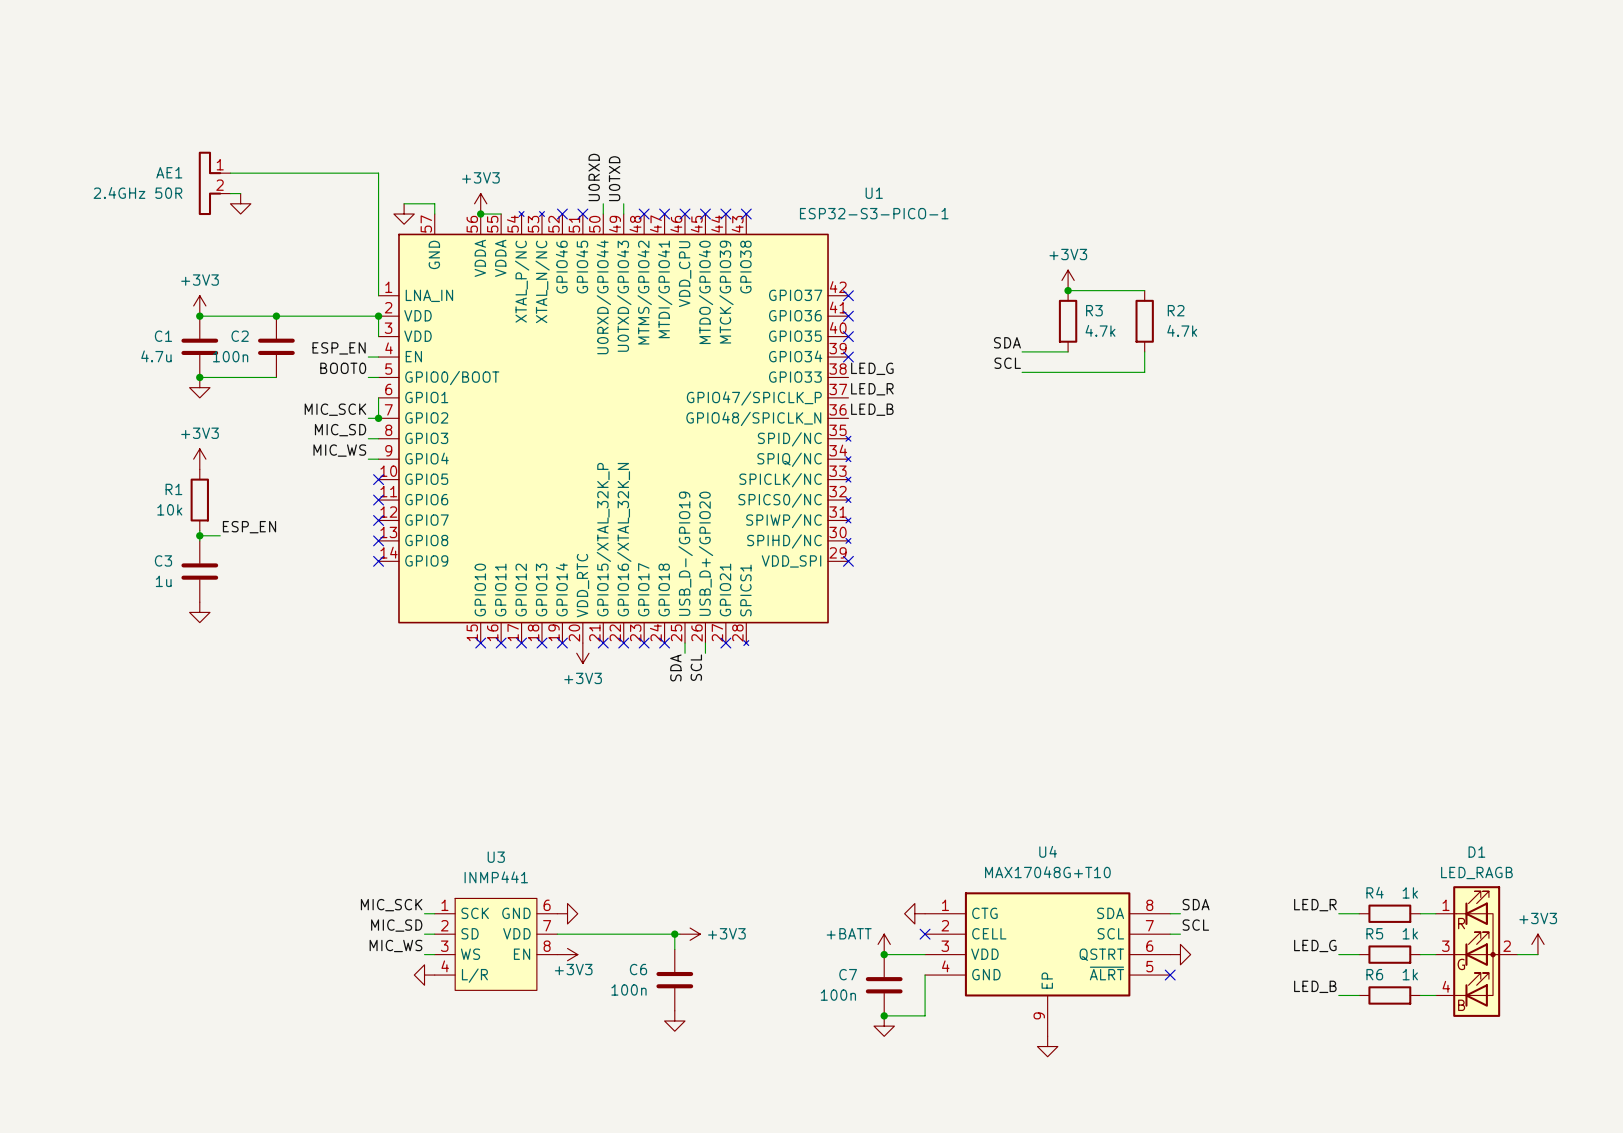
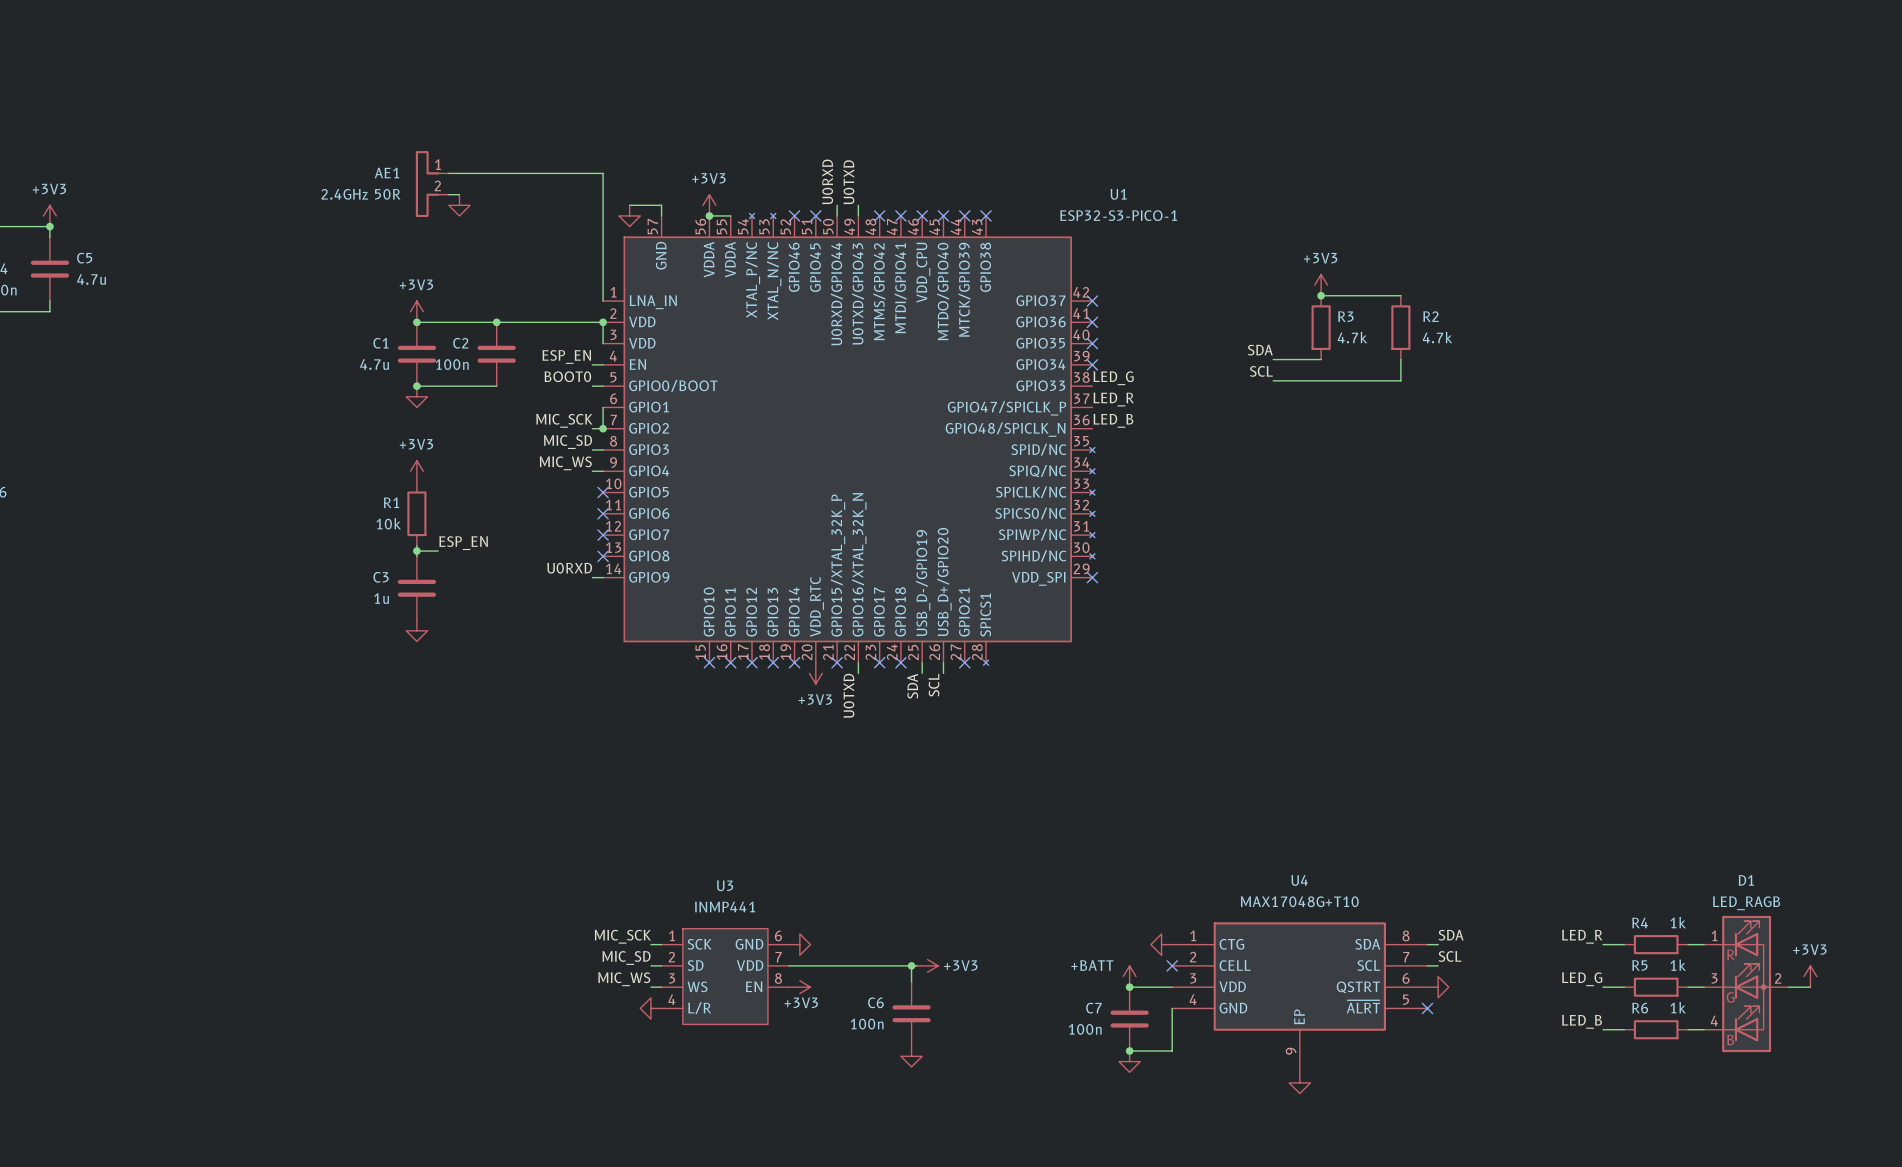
label: none -> U0RXD (569, 568)
wire: none -> (592, 577) (603, 577)
no-connect mark: (378, 561) -> none
wire: none -> (858, 662) (858, 673)
no-connect mark: (623, 643) -> none
label: none -> U0TXD (848, 695)

